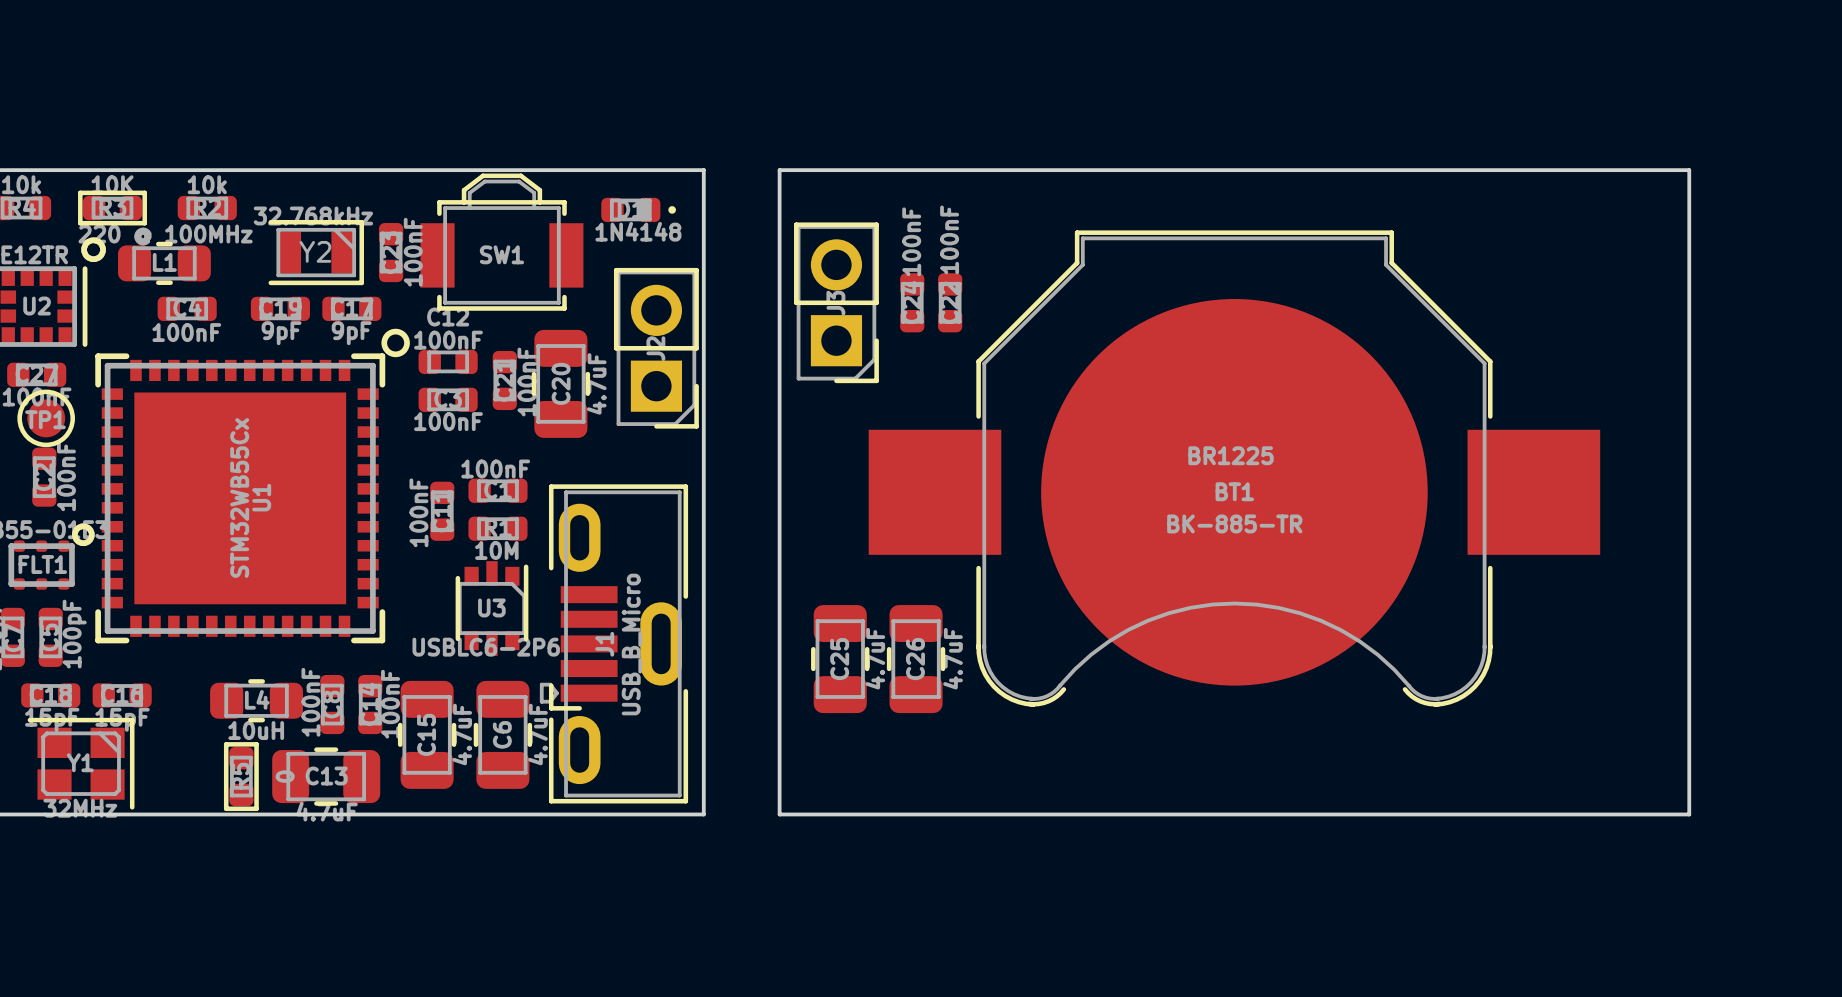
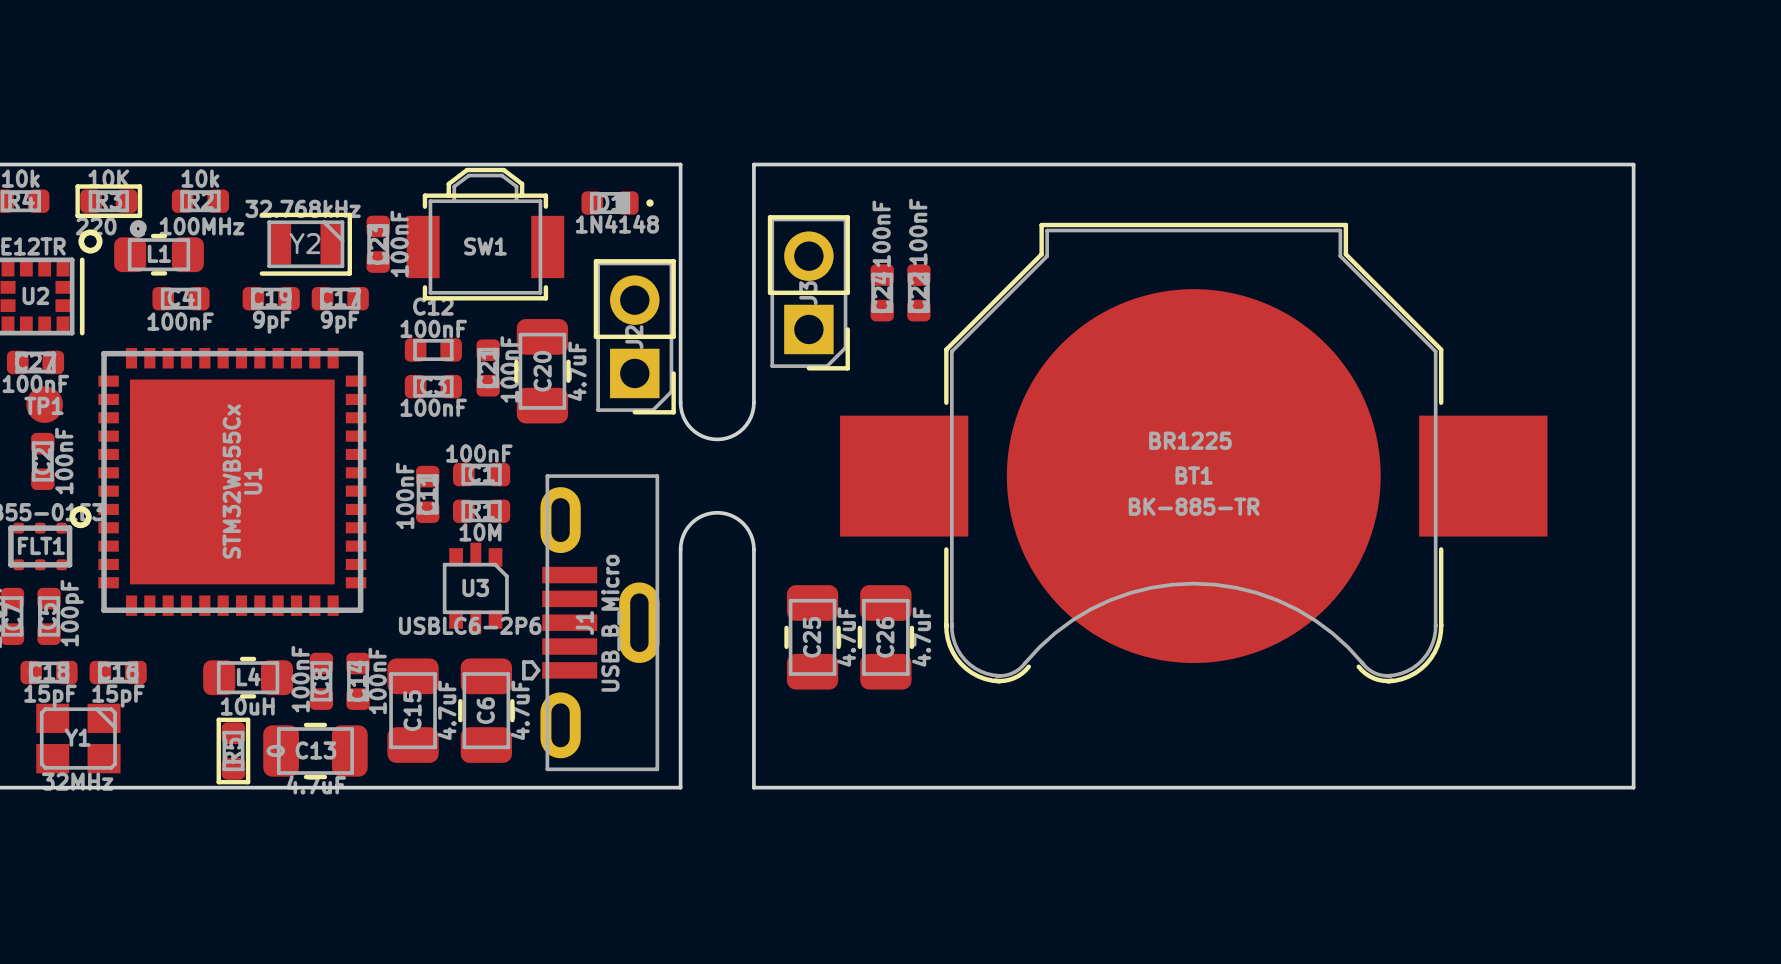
U1 footprint: [95, 328, 410, 644] -> [98, 348, 367, 616]
TP1 footprint: [17, 389, 75, 448] -> [26, 386, 63, 423]
board edge: (703, 416) (703, 568) -> (680, 402) (683, 416) (691, 428) (703, 436) (717, 439) (731, 436) (743, 428) (751, 416) (753, 402)
board edge: (779, 416) (779, 568) -> (680, 549) (683, 535) (691, 523) (703, 515) (717, 512) (731, 515) (743, 523) (751, 535) (753, 549)
J1 footprint: [539, 484, 689, 804] -> [522, 474, 660, 772]
U3 footprint: [455, 561, 529, 656] -> [442, 542, 509, 635]
C15 footprint: [397, 680, 457, 789] -> [387, 658, 439, 763]
Y1 footprint: [27, 717, 135, 810] -> [36, 703, 121, 774]

